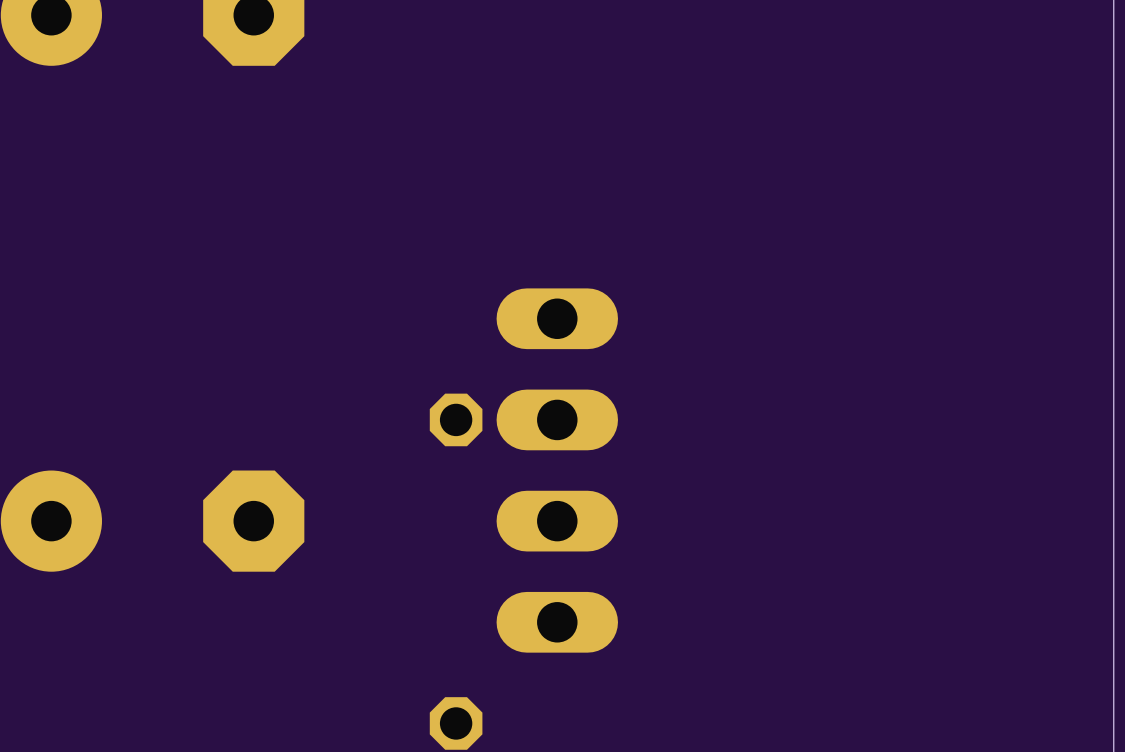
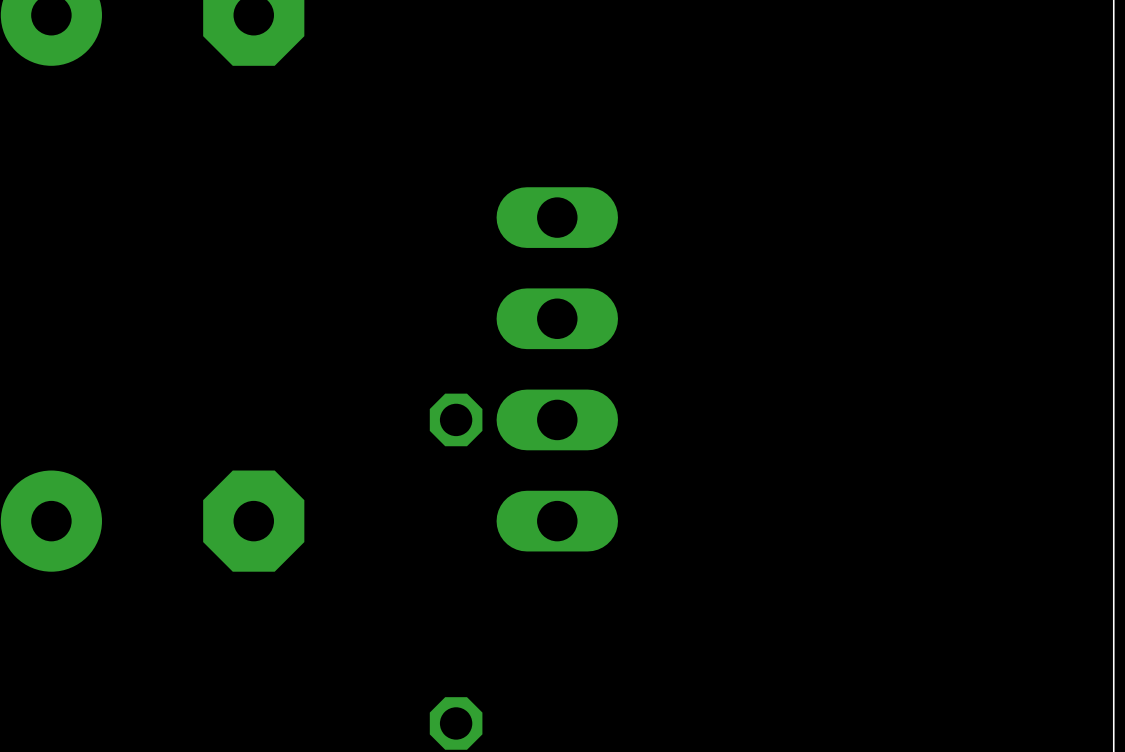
part position: (557, 470) -> (557, 369)

